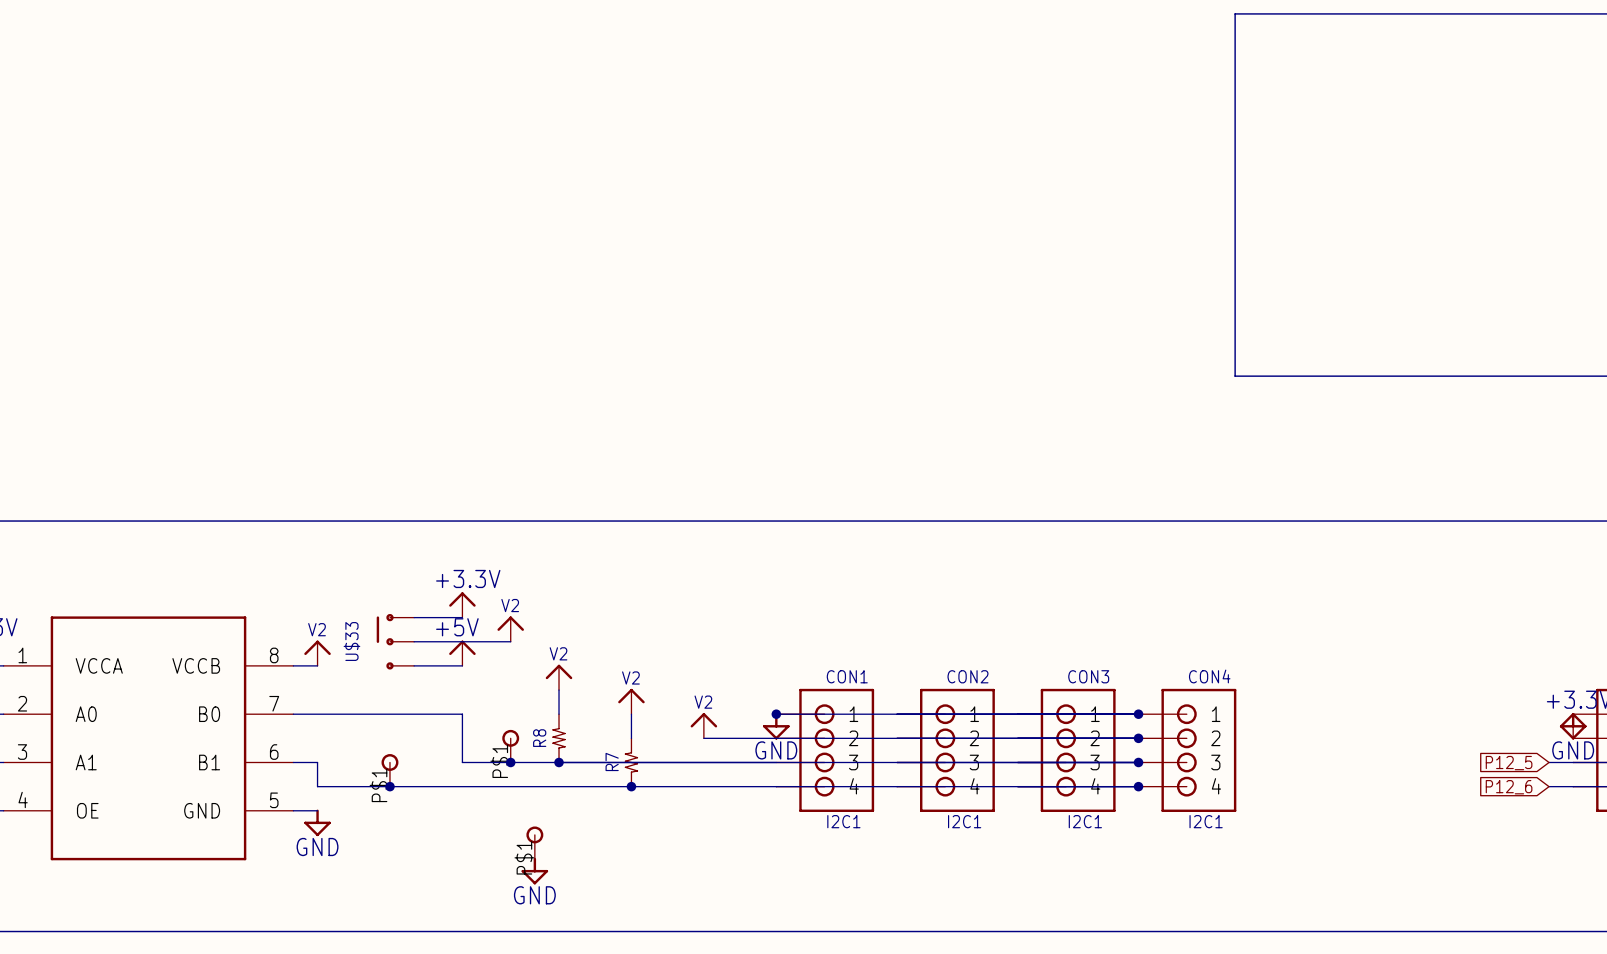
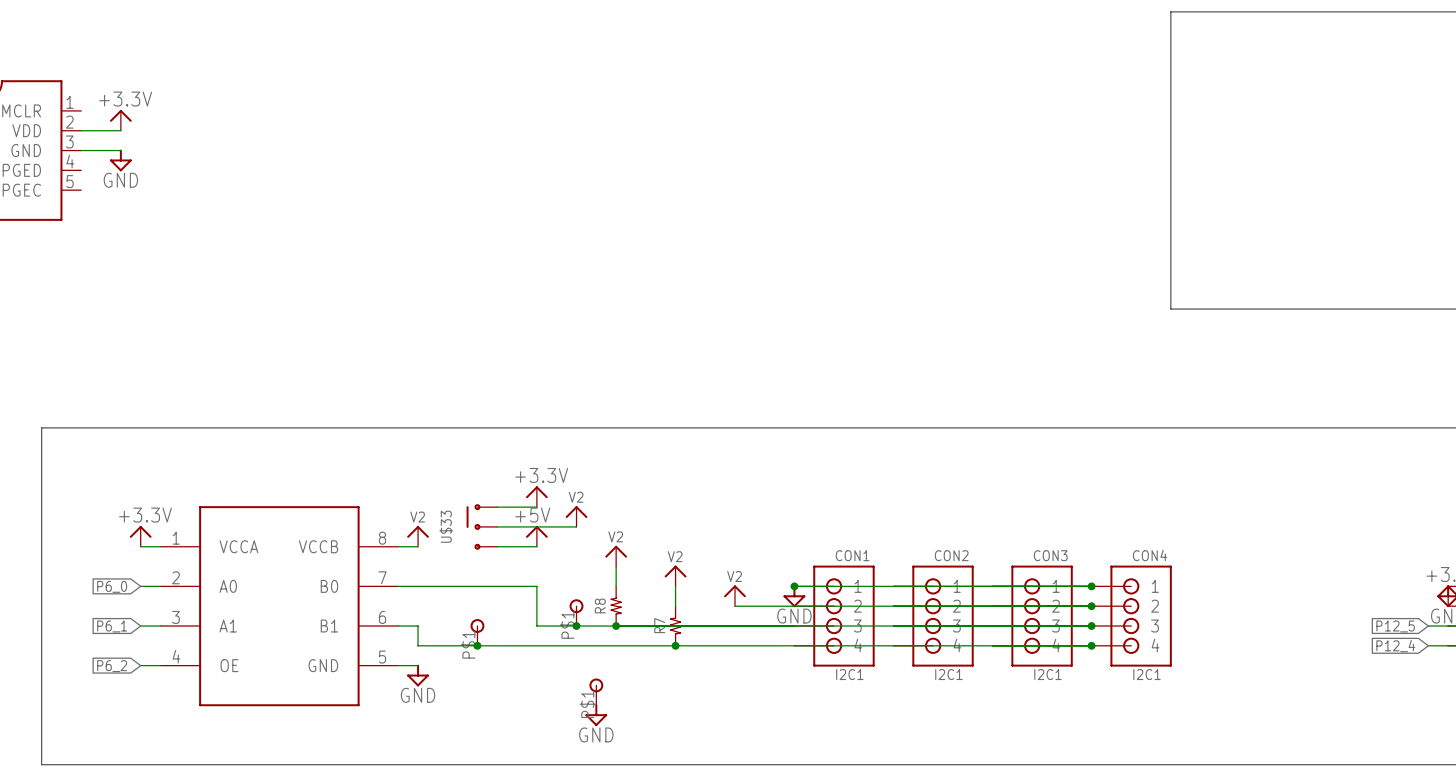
global label: P12_6 (1509, 787) -> P12_4 (1395, 646)

